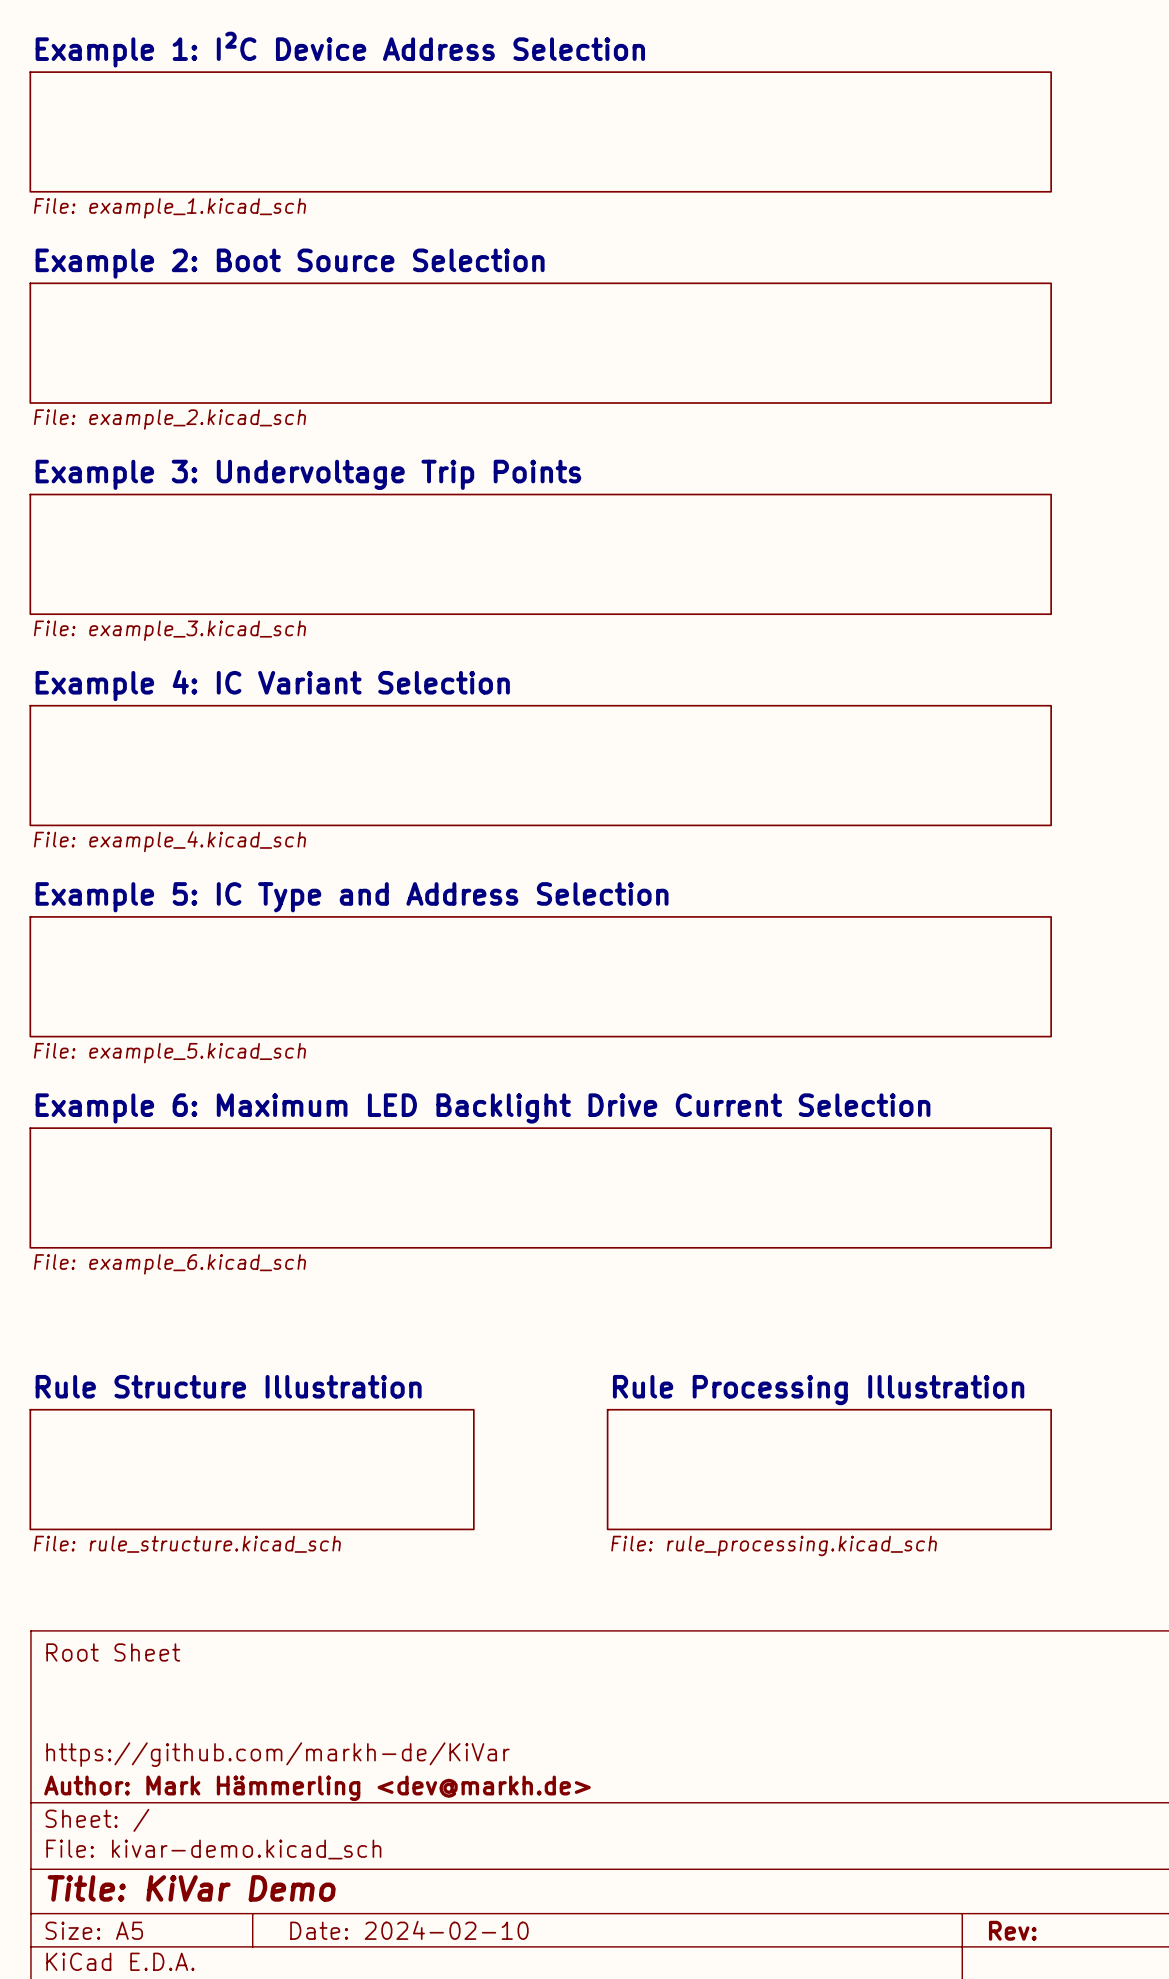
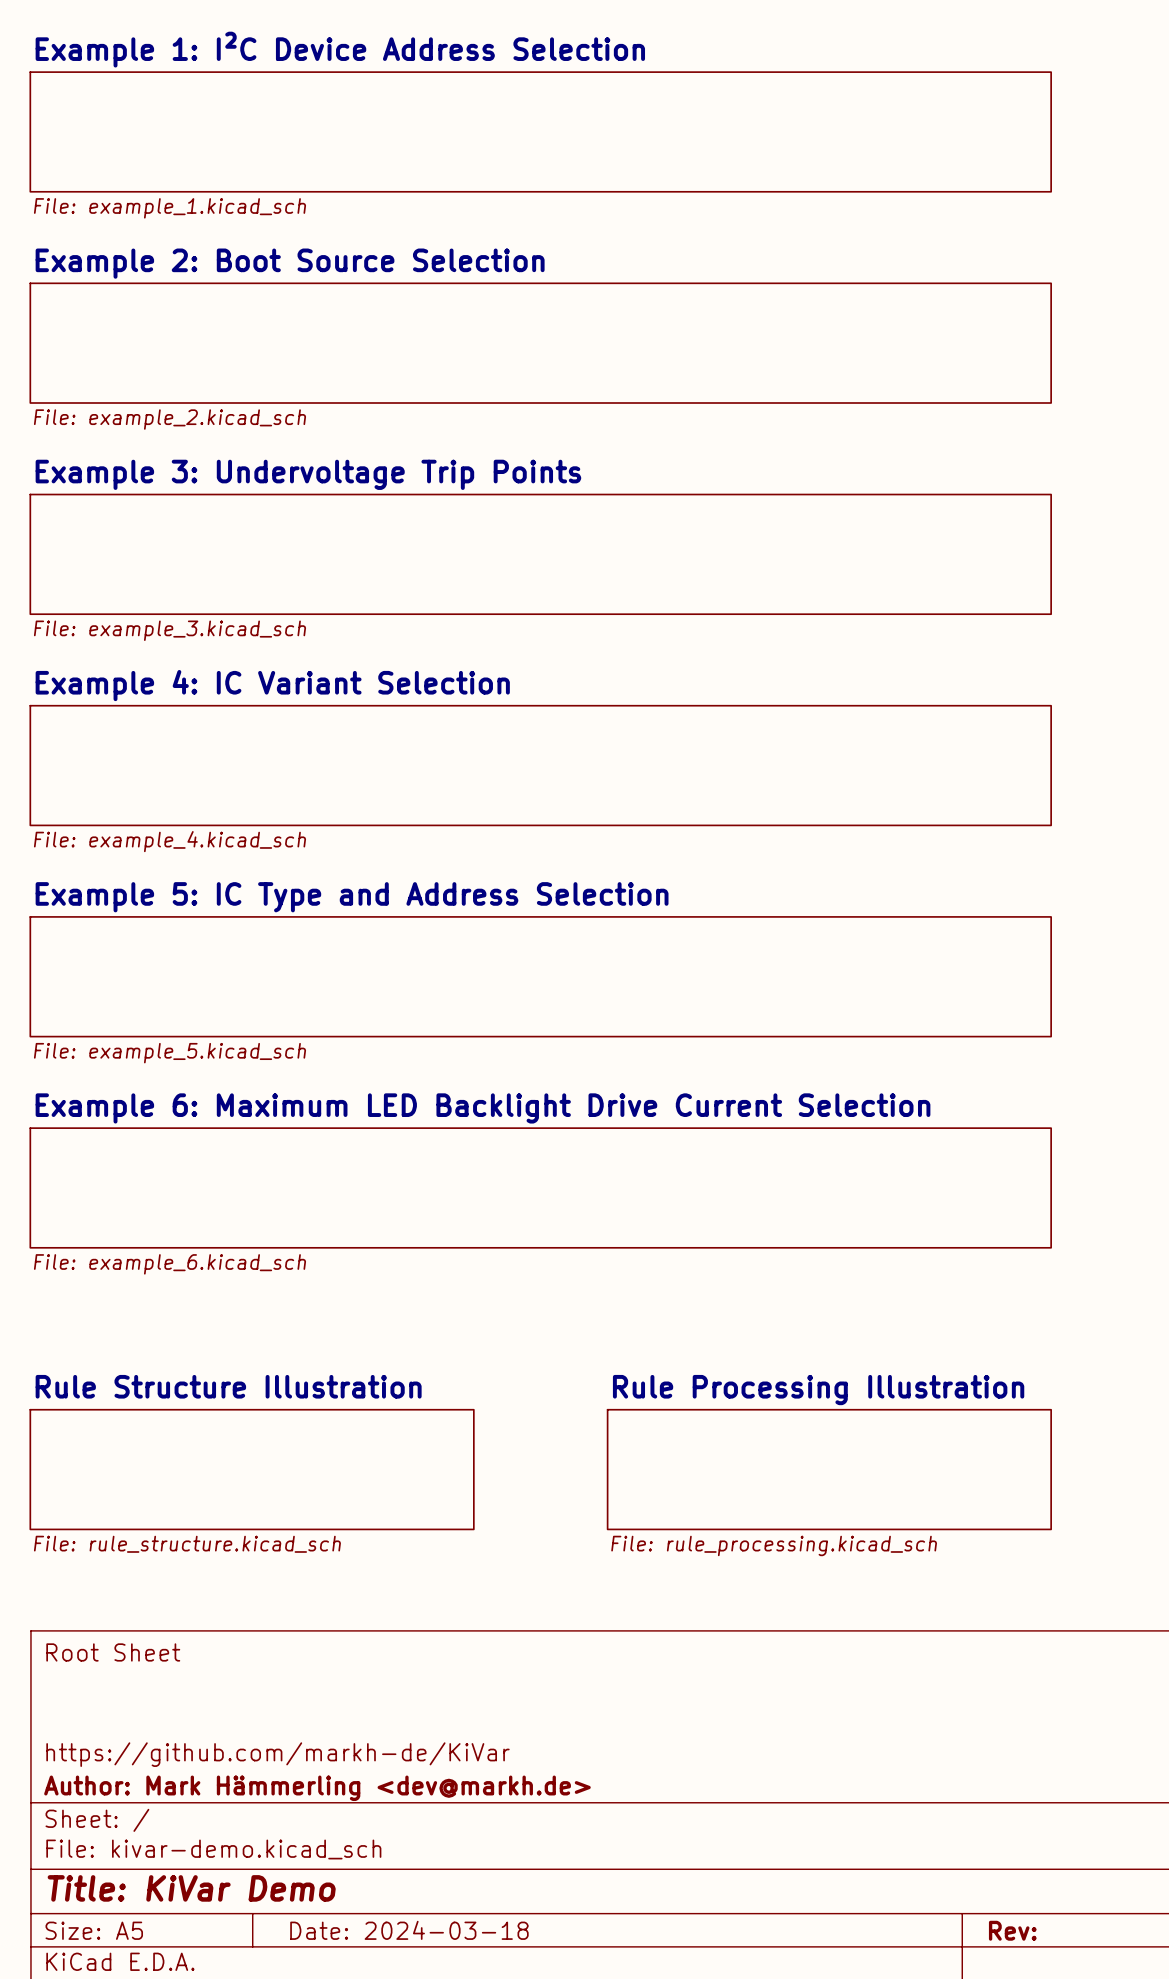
title block: Date: 2024-02-10 (409, 1930) -> Date: 2024-03-18 (409, 1930)

